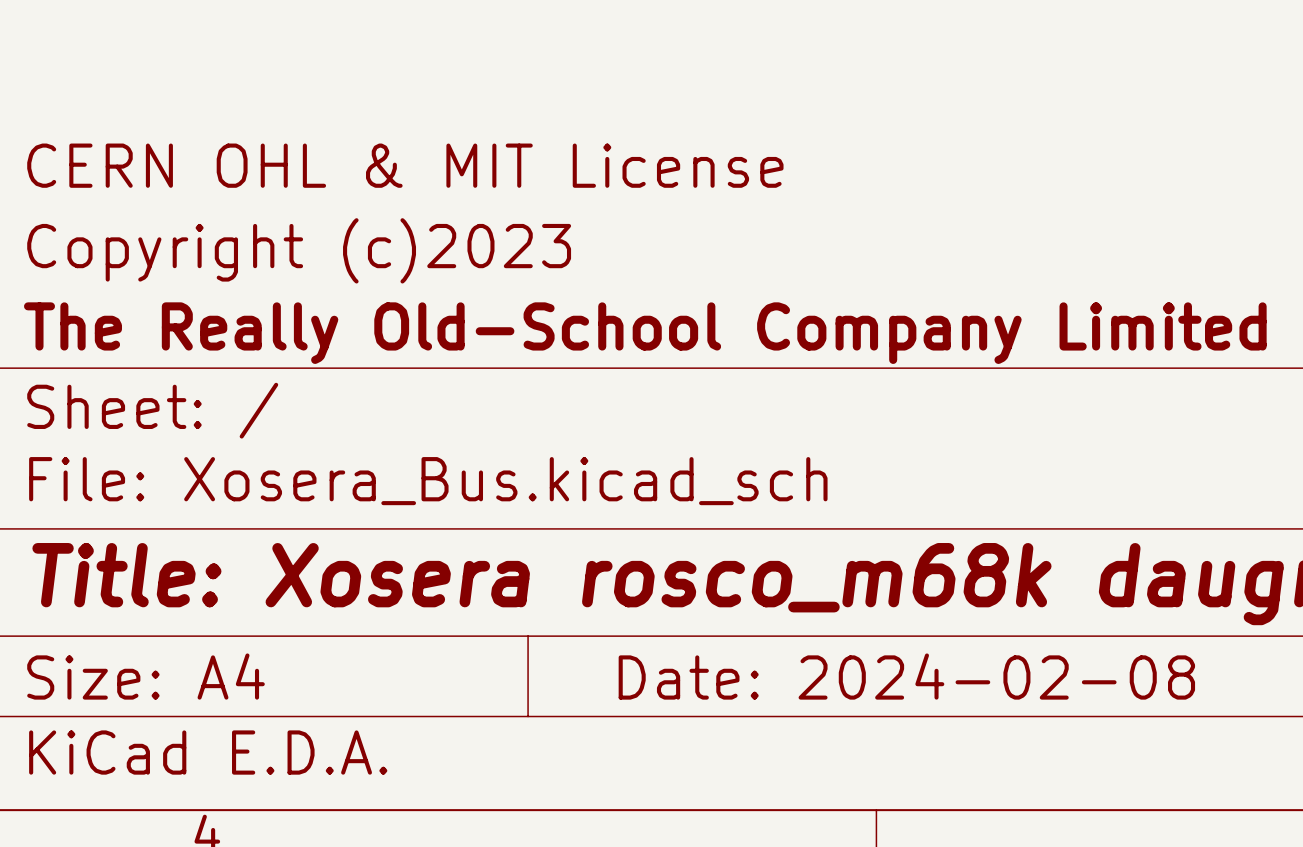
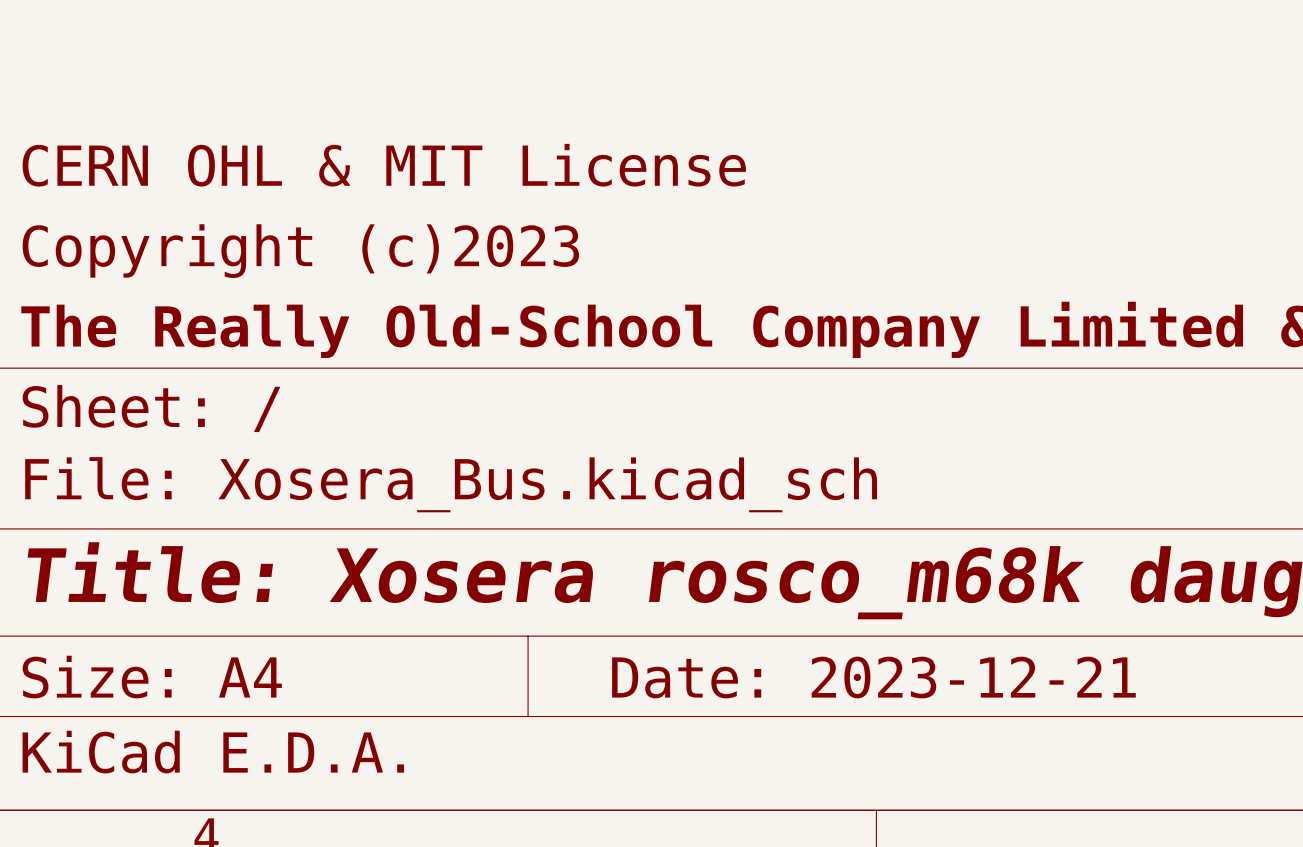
title block: Date: 2024-02-08 (906, 676) -> Date: 2023-12-21 (873, 677)

